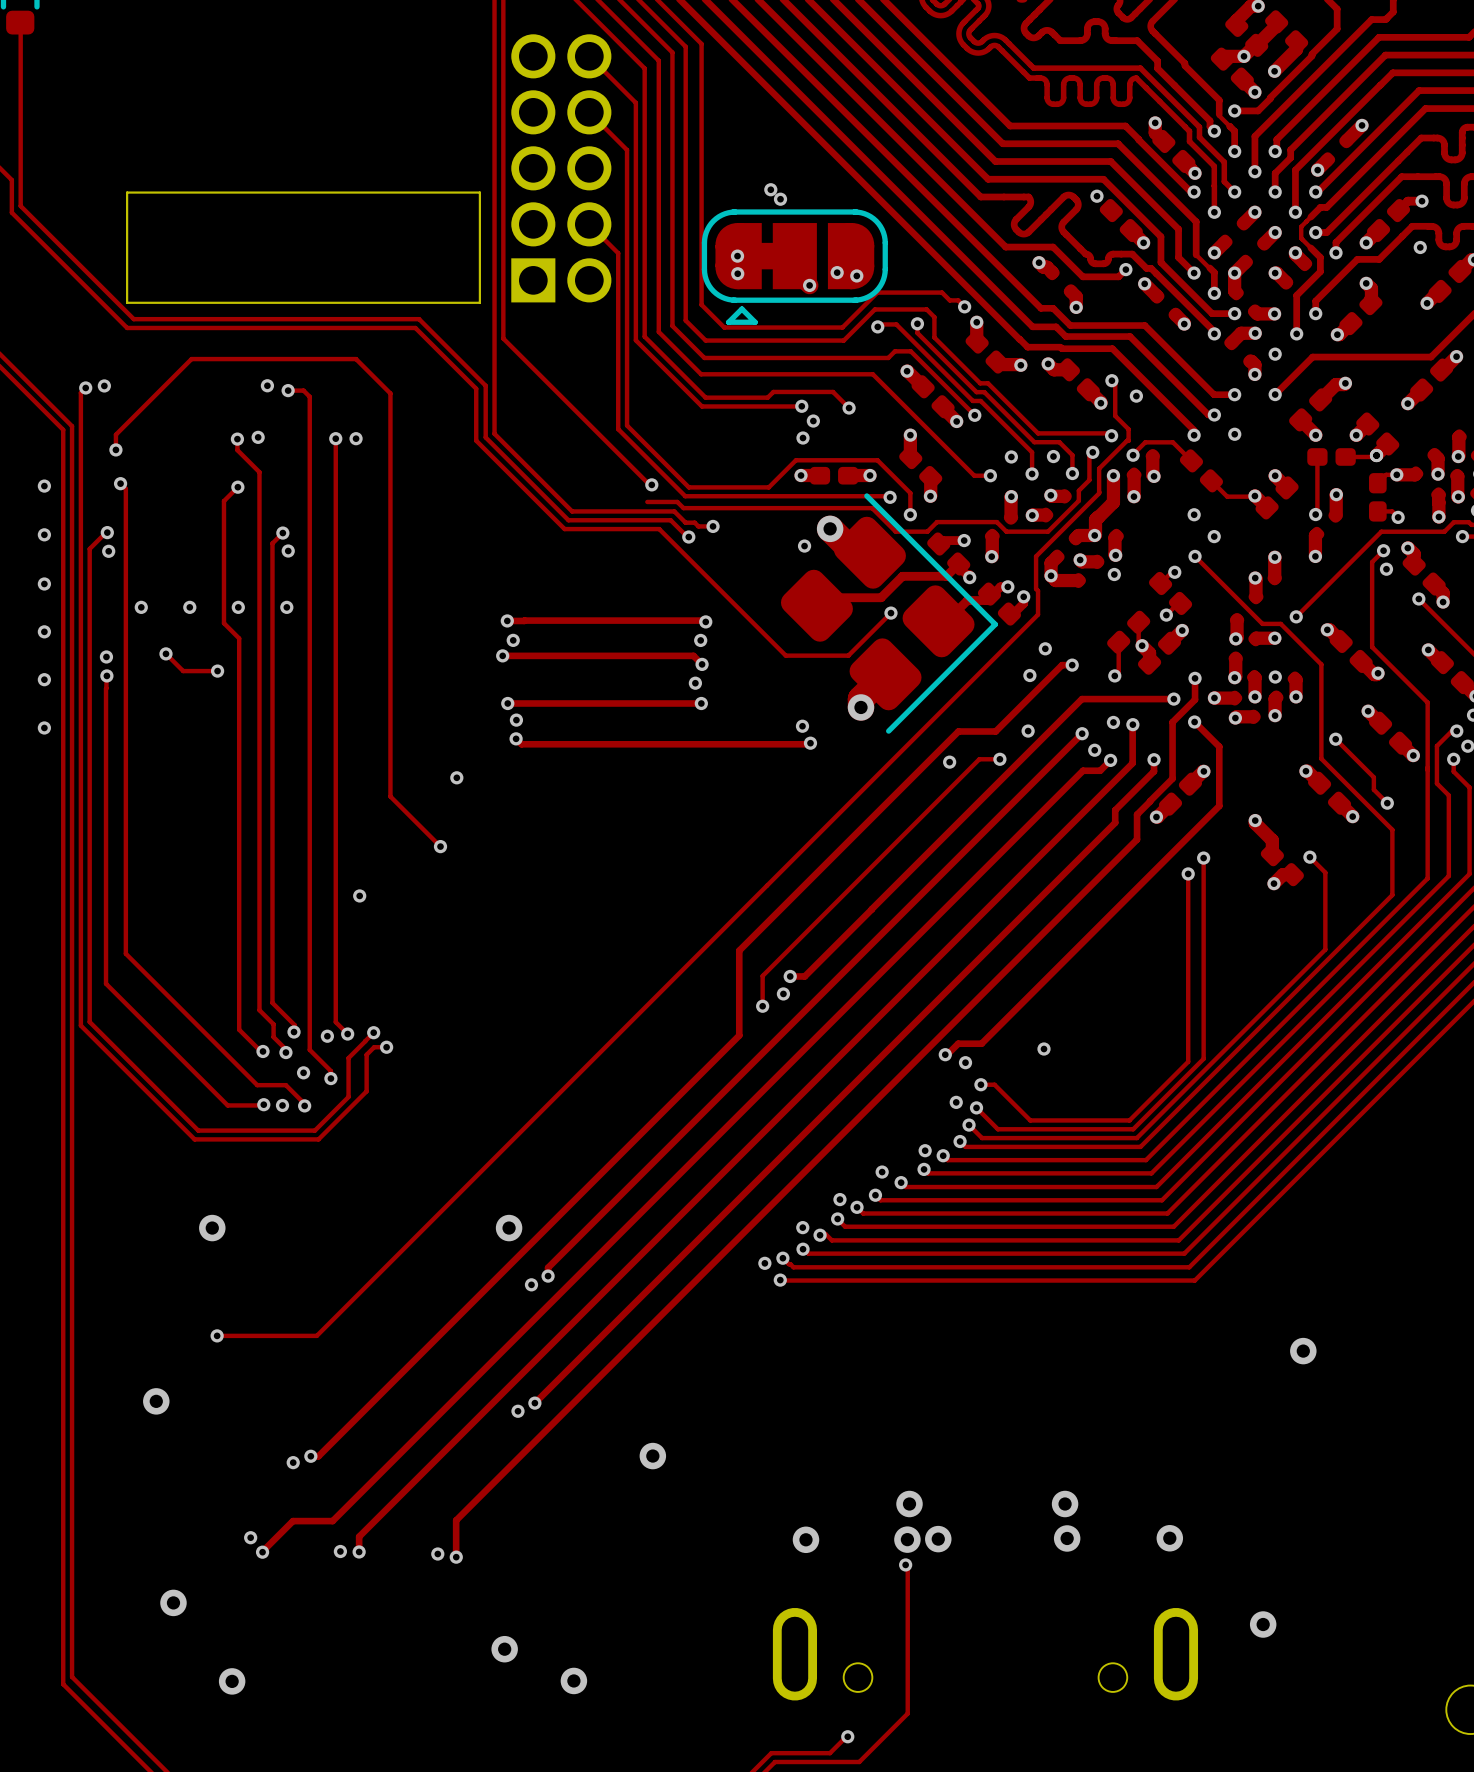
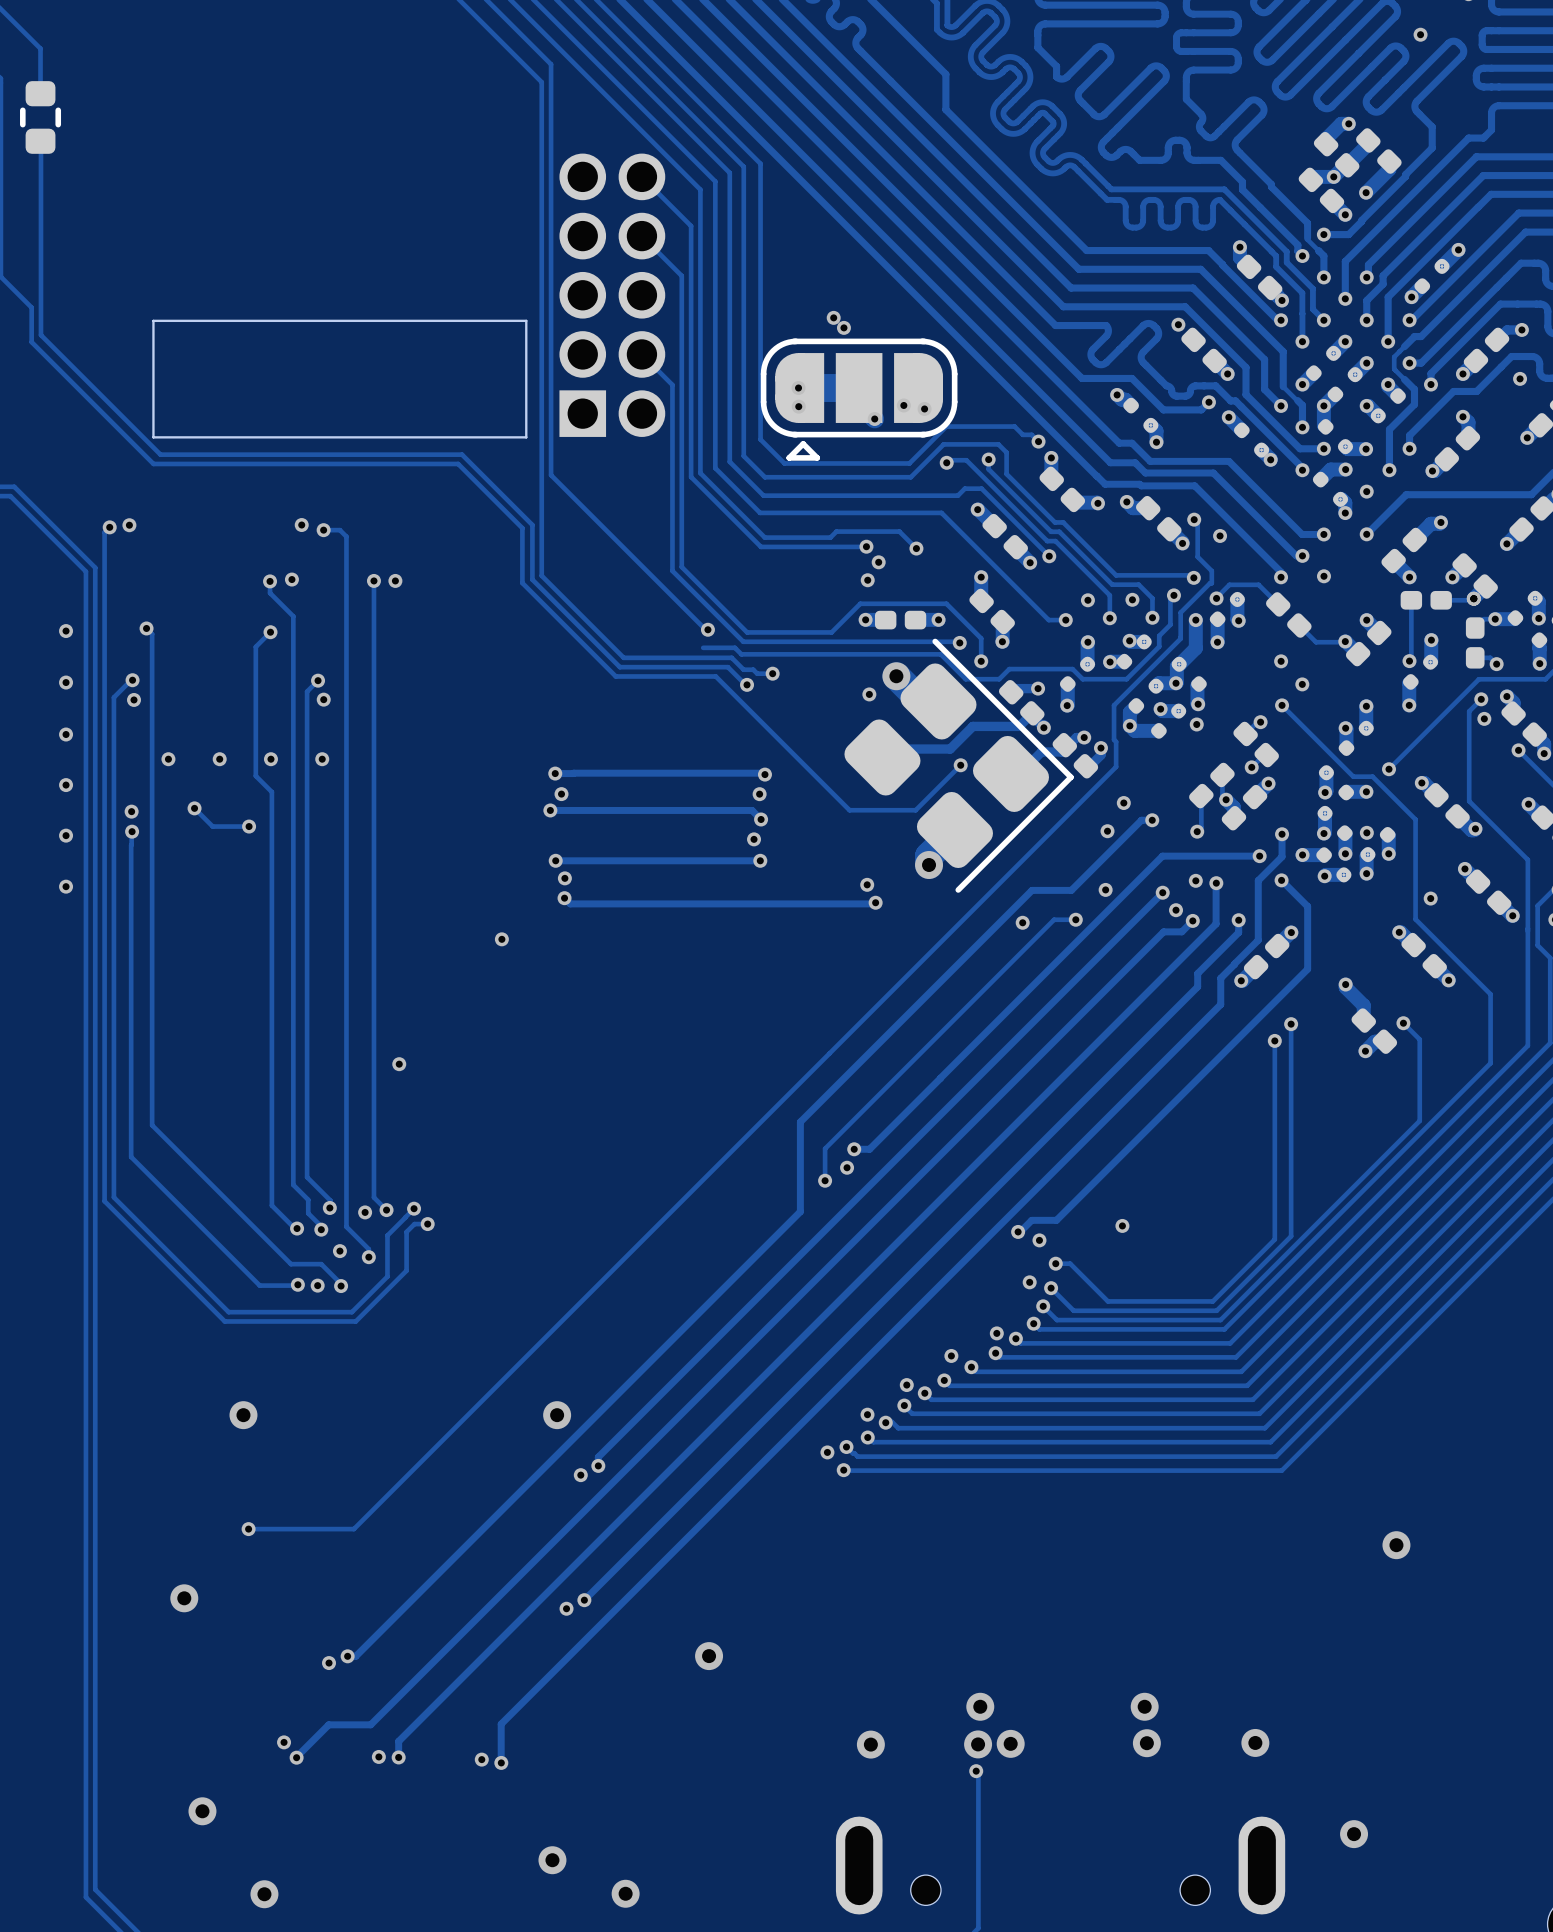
track: (115, 449) (115, 434) (191, 359) (356, 359) (390, 393) (390, 796) (440, 846) -> none
via: (115, 449) -> none
track: (1335, 739) (1373, 777) (1373, 789) (1387, 803) -> none
via: (1387, 803) -> none
via: (440, 846) -> none

